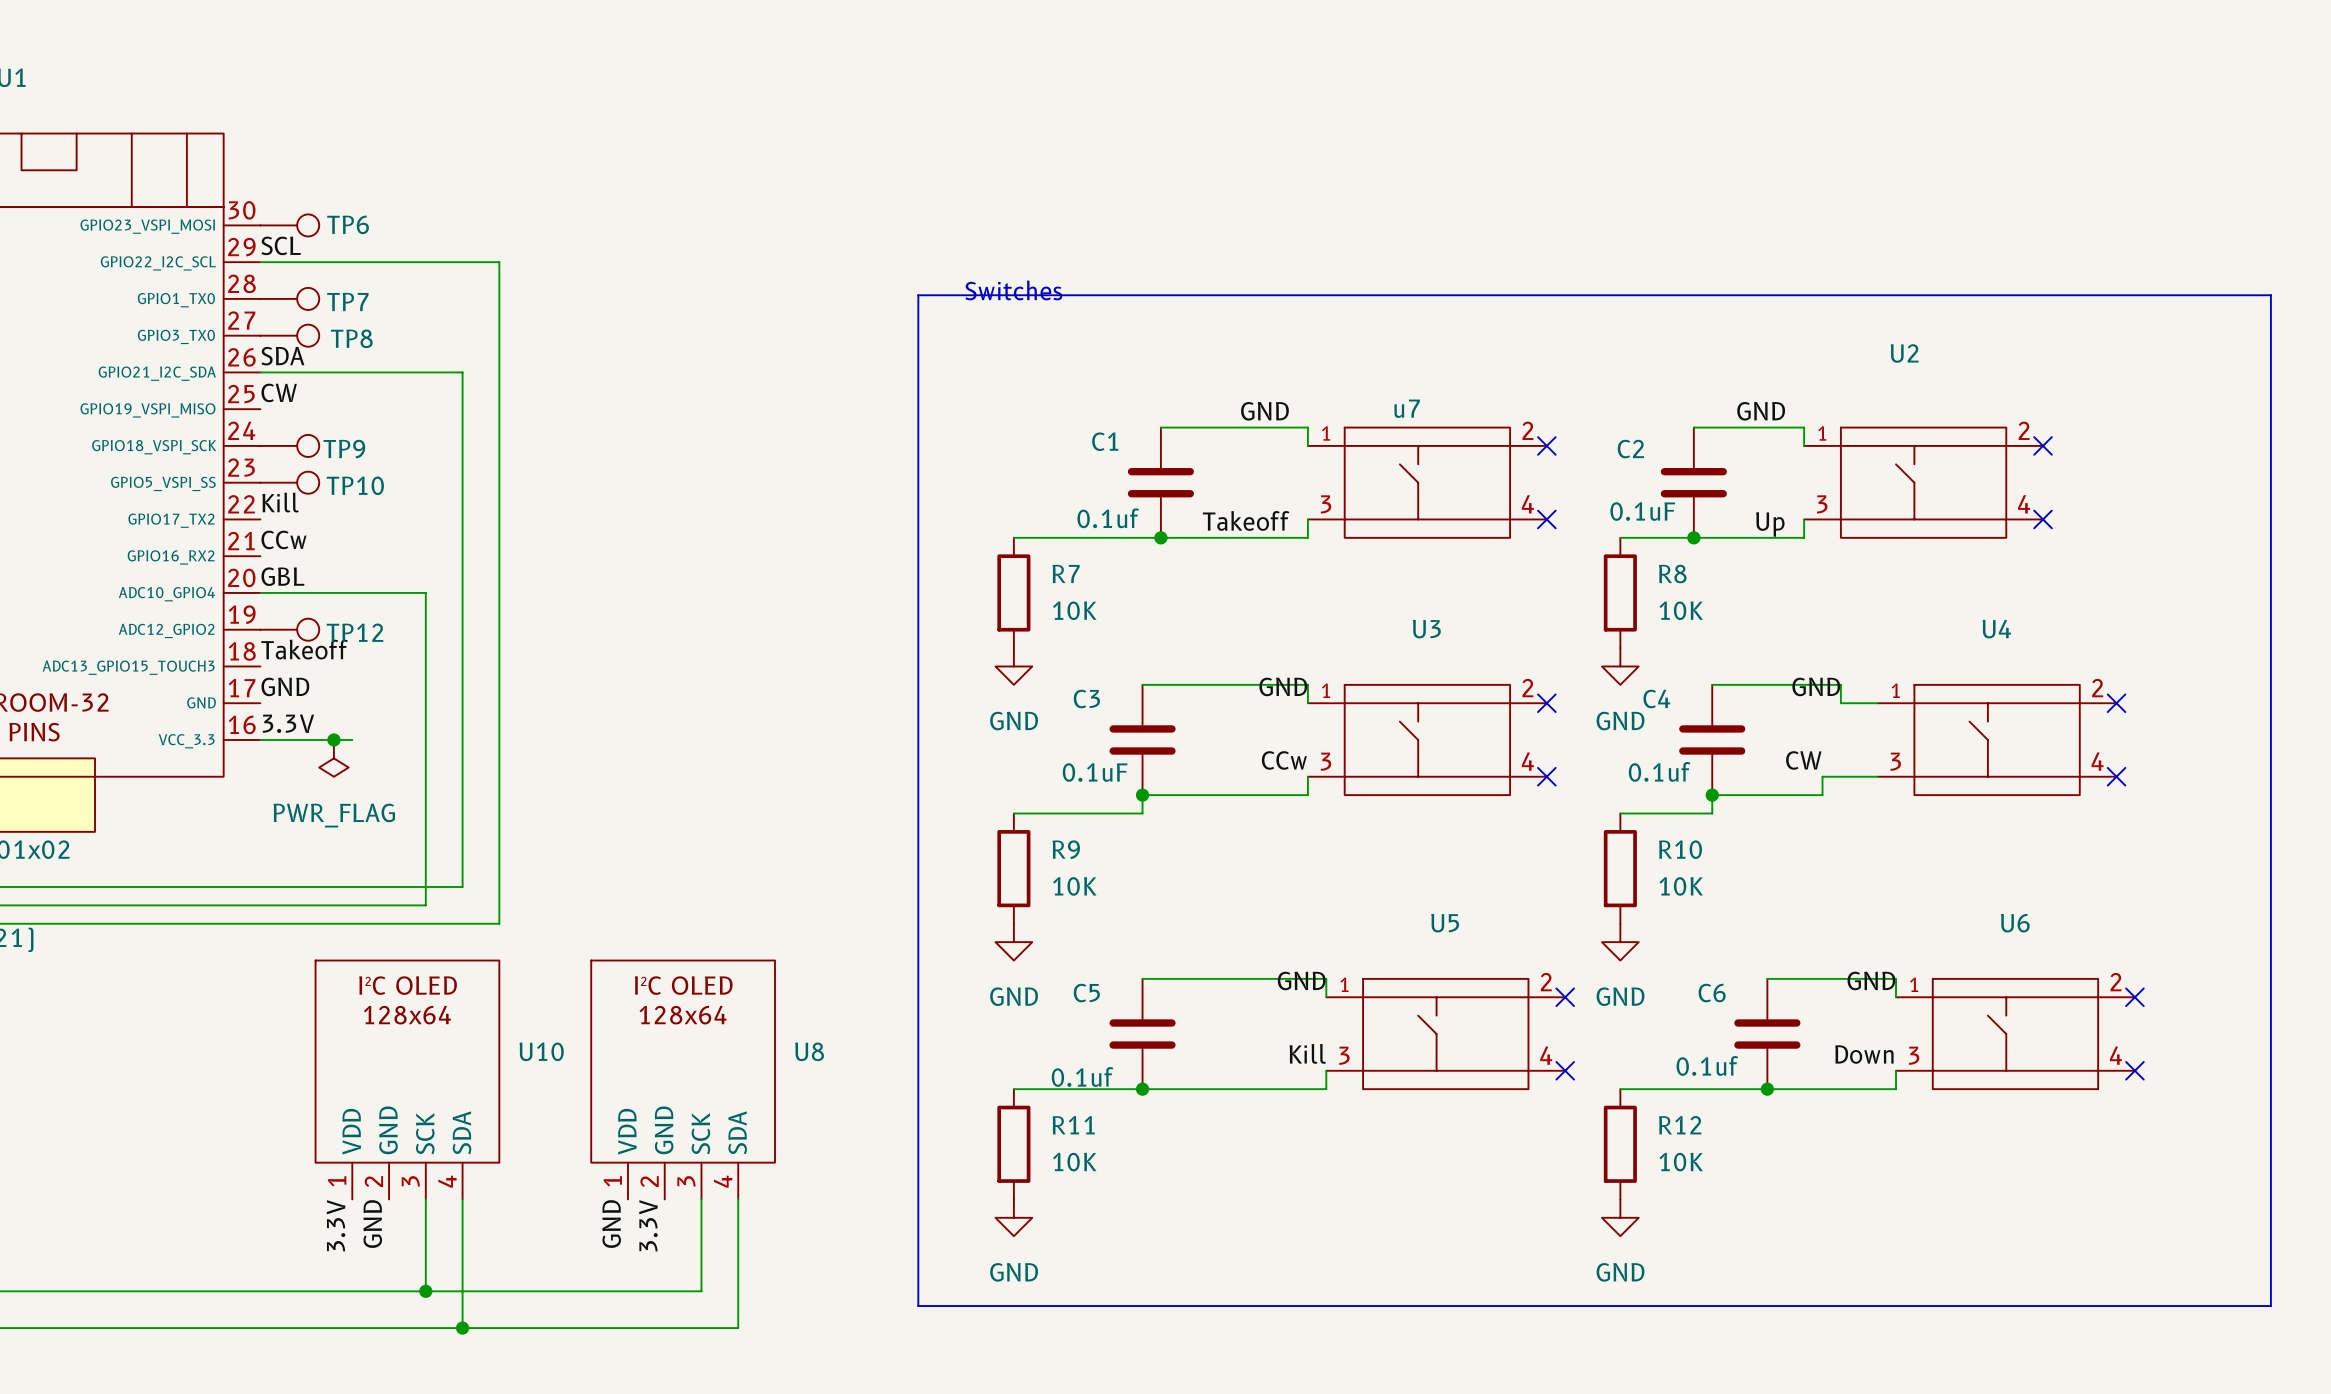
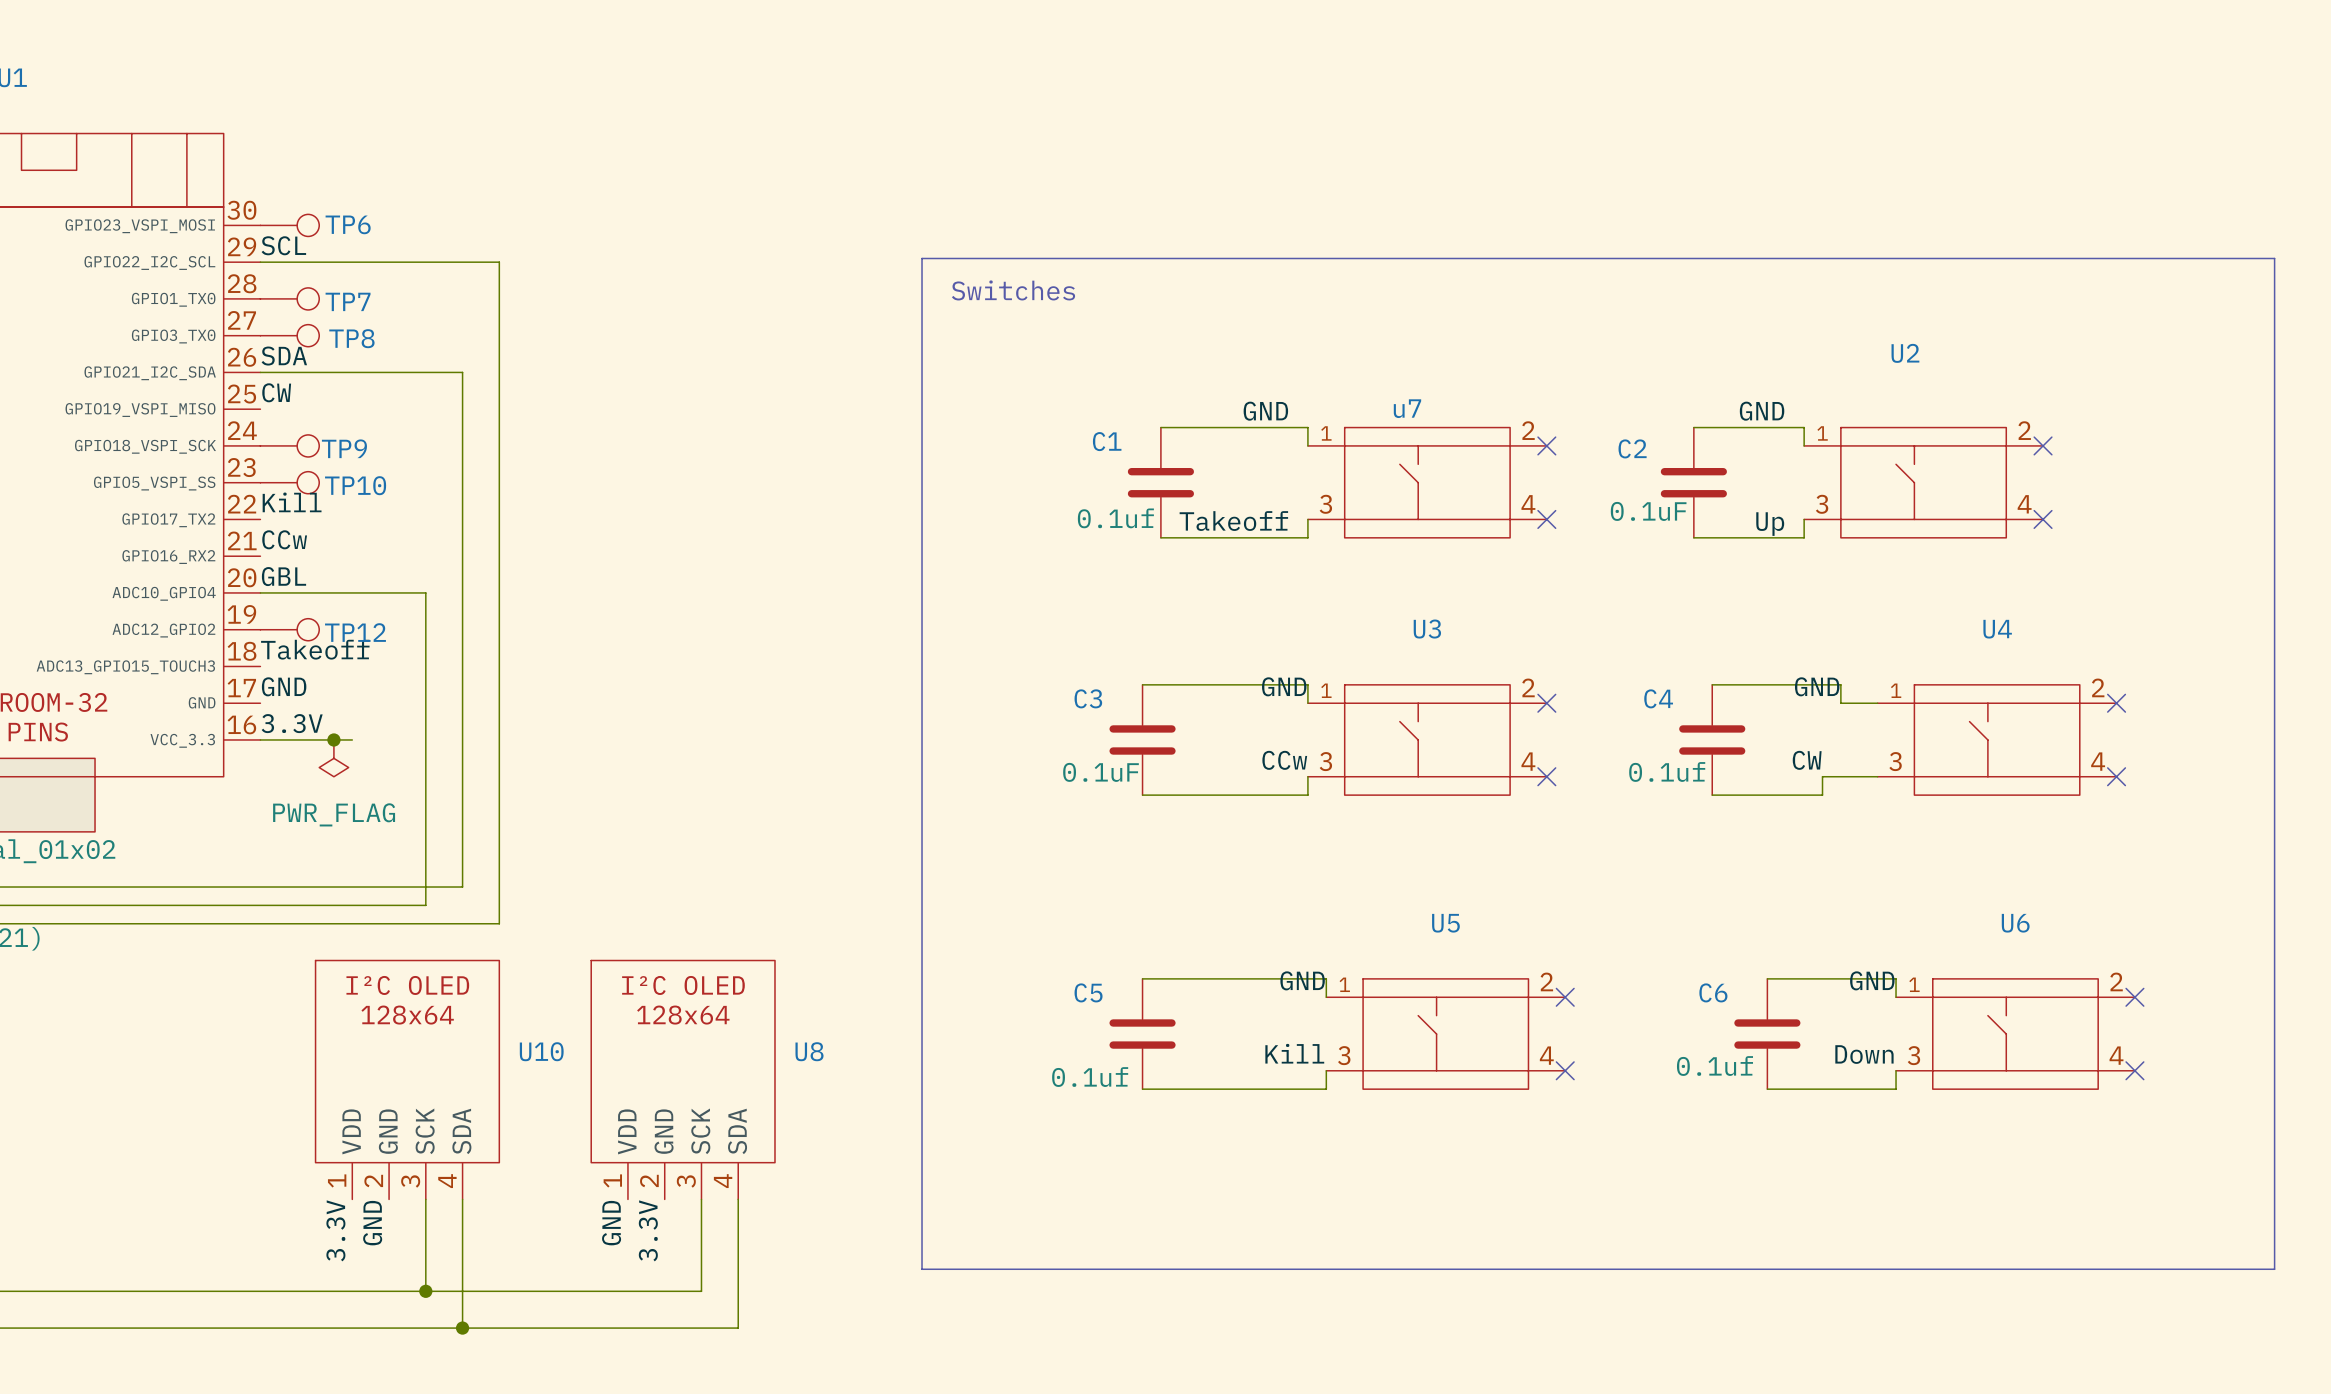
line: (918, 295) (2270, 295) (2270, 1306) (918, 1306) (918, 295) -> (922, 258) (2274, 258) (2274, 1269) (922, 1269) (922, 258)
wire: (1013, 537) (1160, 537) -> none
junction: (1160, 537) -> none
wire: (1620, 537) (1693, 537) -> none
junction: (1693, 537) -> none
R7: 10K (1013, 592) -> none
R8: 10K (1620, 592) -> none
power symbol: GND (1013, 666) -> none
power symbol: GND (1620, 666) -> none
wire: (1142, 795) (1142, 813) (1013, 813) -> none
junction: (1142, 795) -> none
wire: (1712, 795) (1712, 813) (1620, 813) -> none
junction: (1712, 795) -> none
R9: 10K (1013, 868) -> none
R10: 10K (1620, 868) -> none
power symbol: GND (1013, 942) -> none
power symbol: GND (1620, 942) -> none
wire: (1013, 1089) (1142, 1089) -> none
junction: (1142, 1089) -> none
wire: (1620, 1089) (1767, 1089) -> none
junction: (1767, 1089) -> none
R11: 10K (1013, 1144) -> none
R12: 10K (1620, 1144) -> none
power symbol: GND (1013, 1217) -> none
power symbol: GND (1620, 1217) -> none

